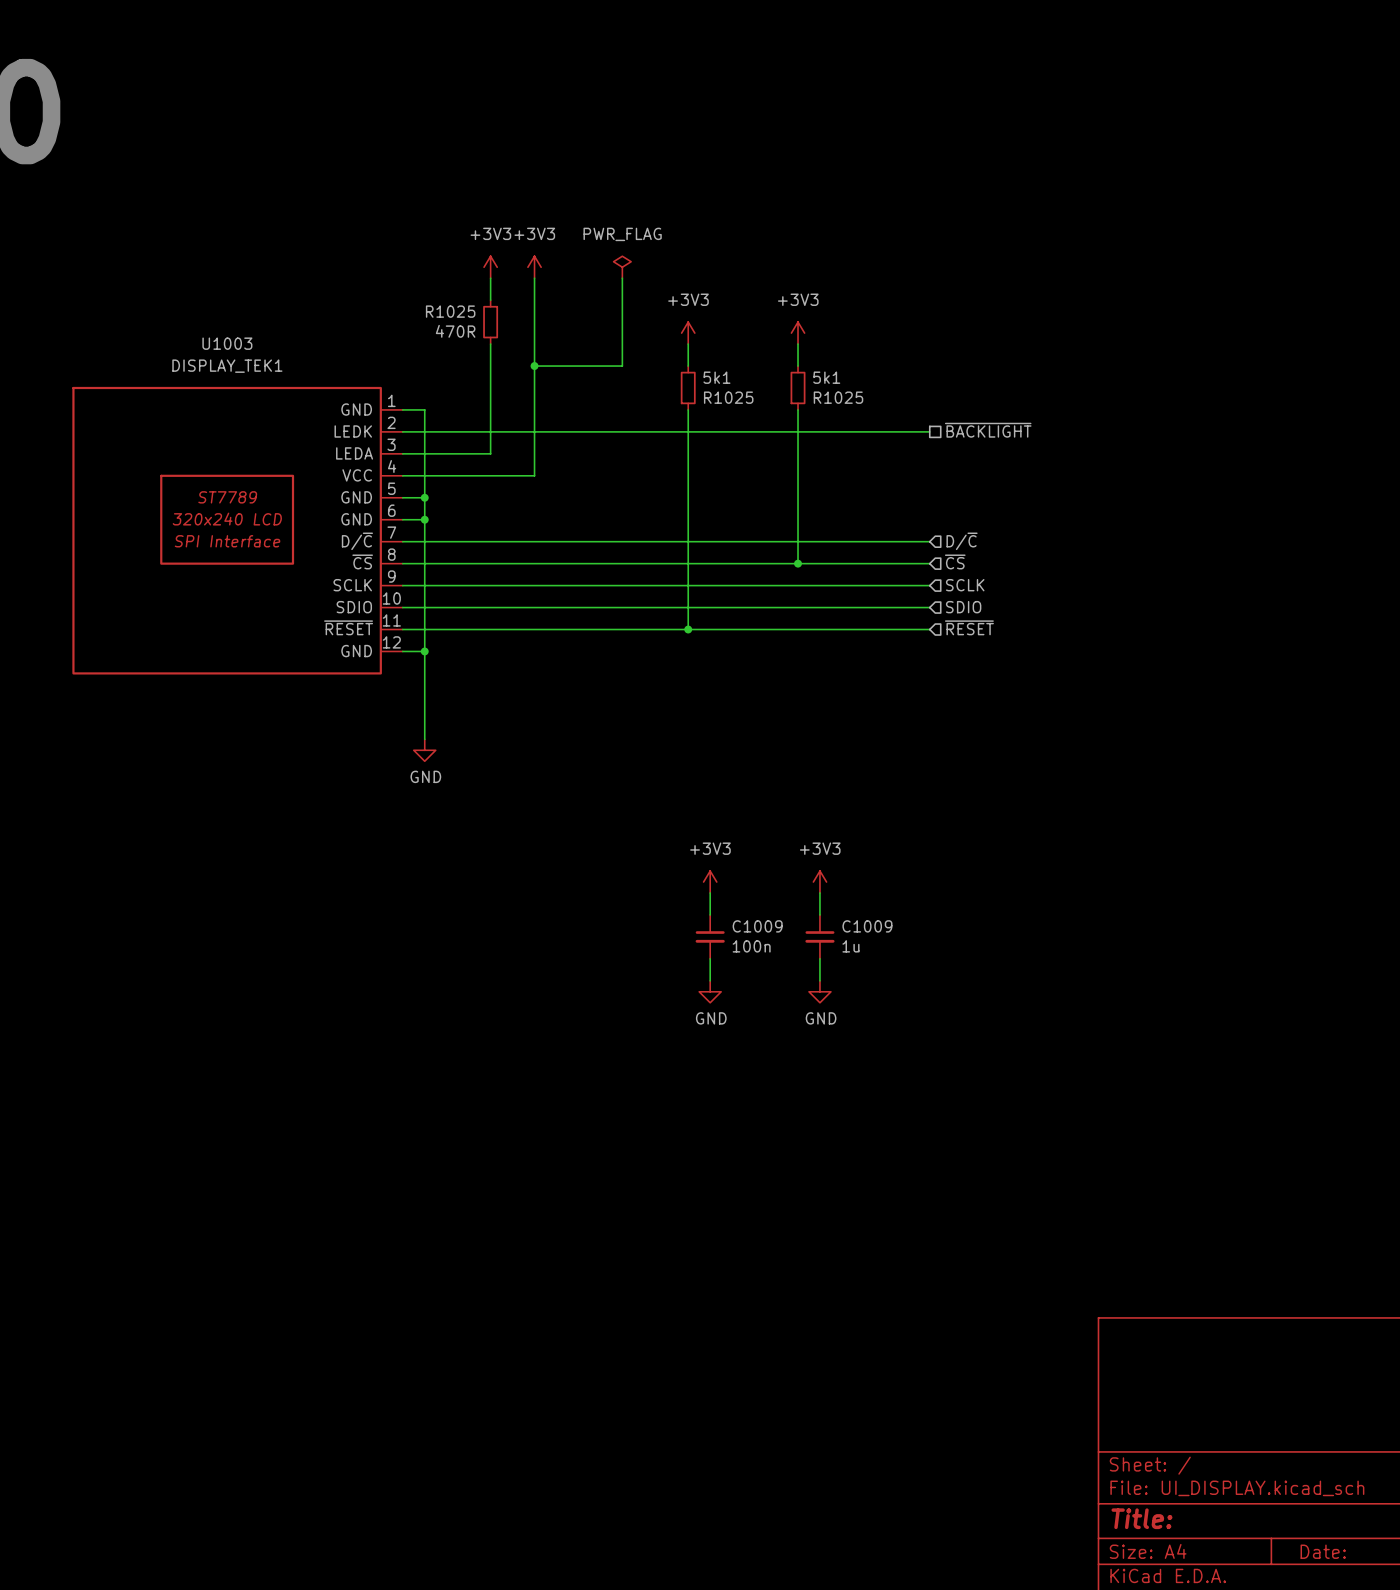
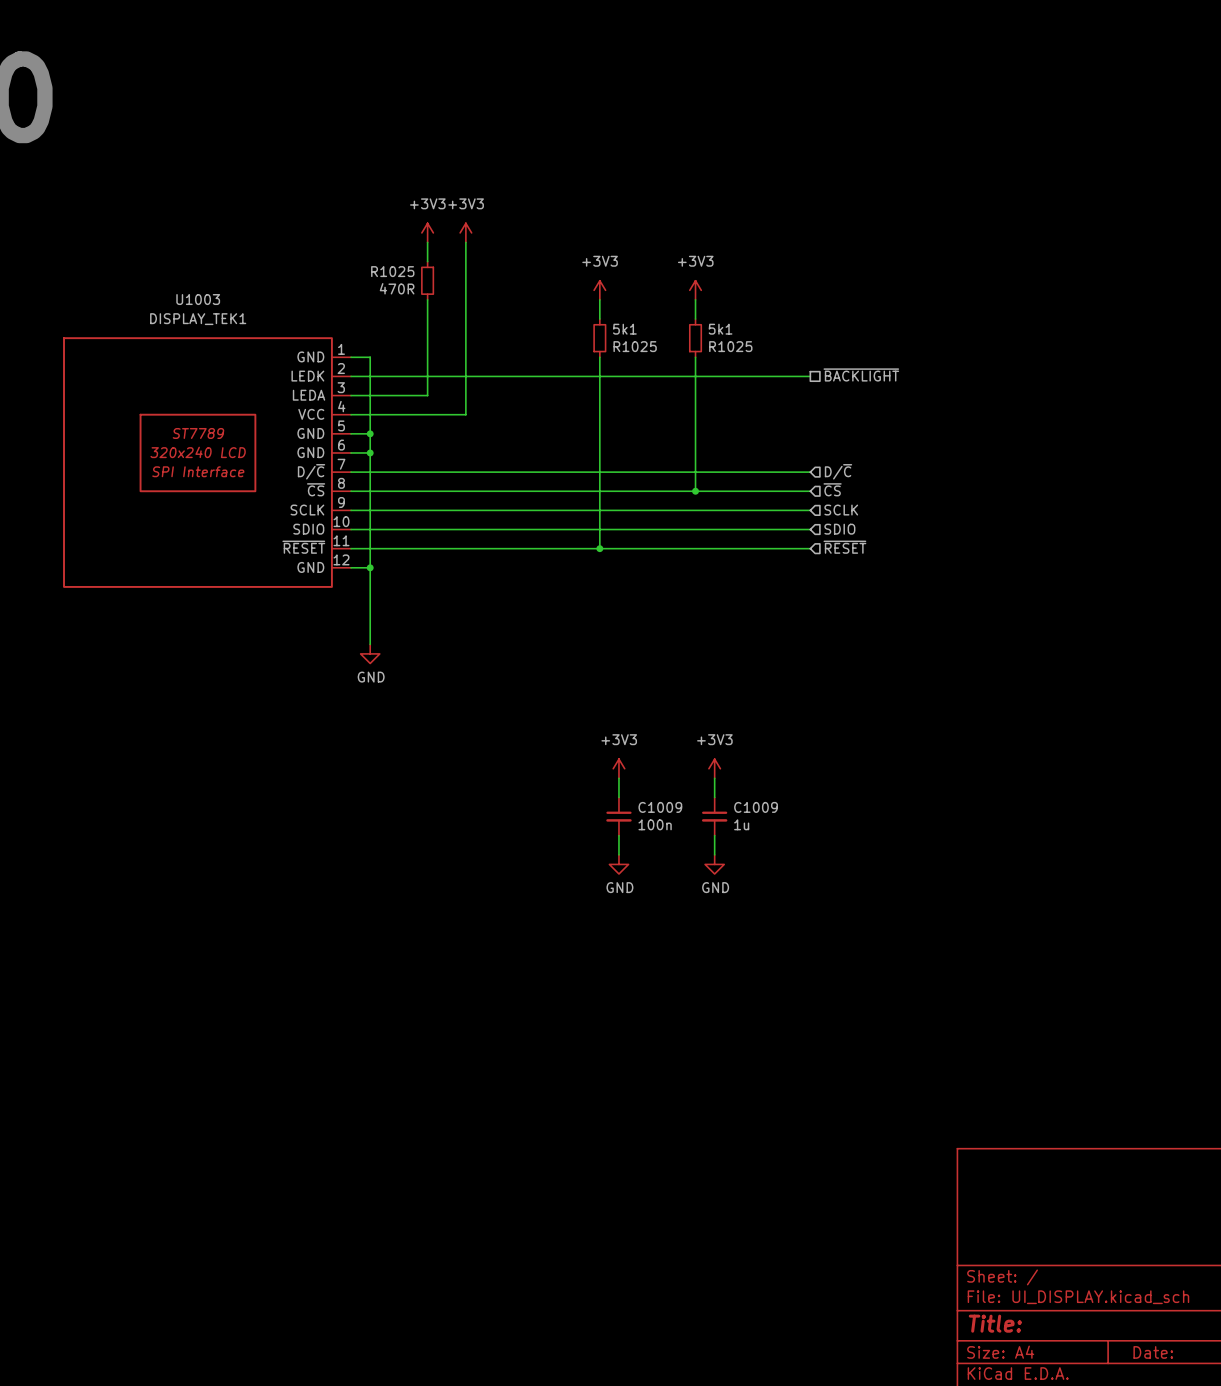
power symbol: PWR_FLAG (622, 267) -> none
wire: (622, 278) (622, 366) (534, 366) -> none
junction: (534, 366) -> none

